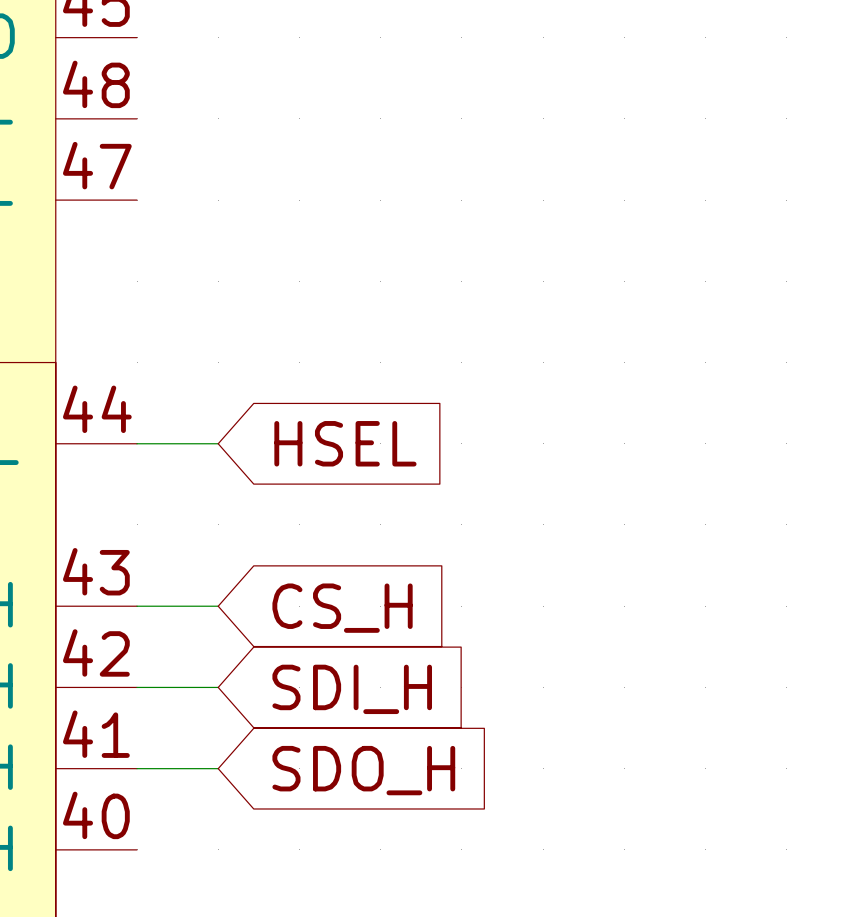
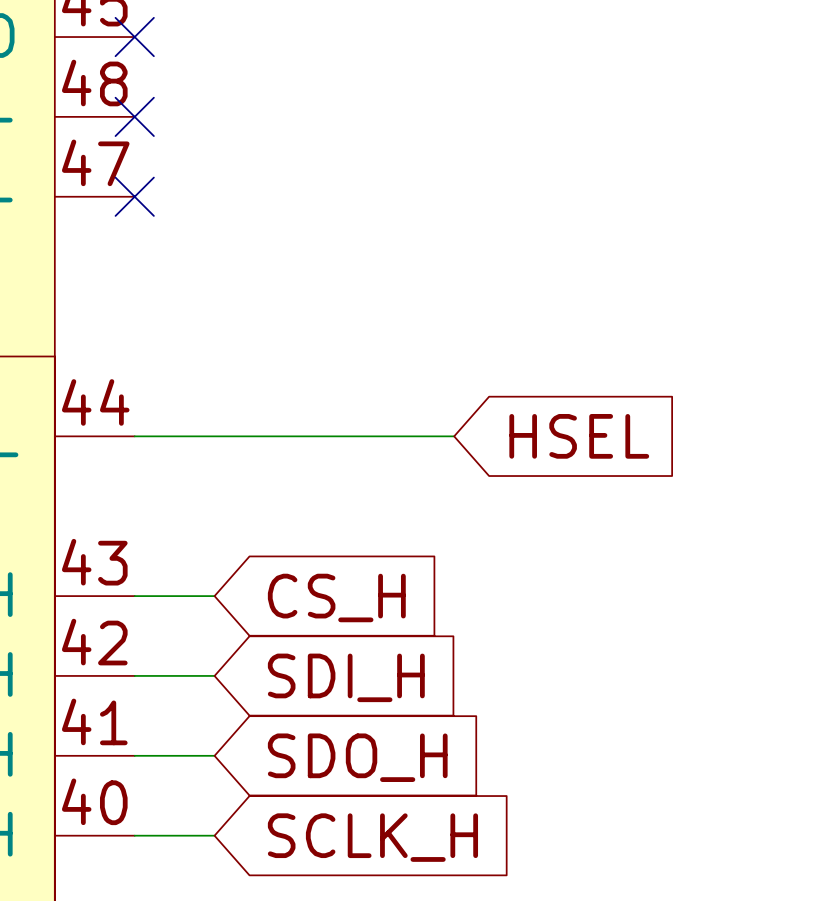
no-connect mark: none -> (134, 37)
no-connect mark: none -> (134, 116)
no-connect mark: none -> (134, 196)
wire: none -> (214, 436) (454, 436)
global label position: HSEL (345, 443) -> HSEL (579, 436)
wire: none -> (134, 835) (214, 835)
global label: none -> SCLK_H (372, 837)

